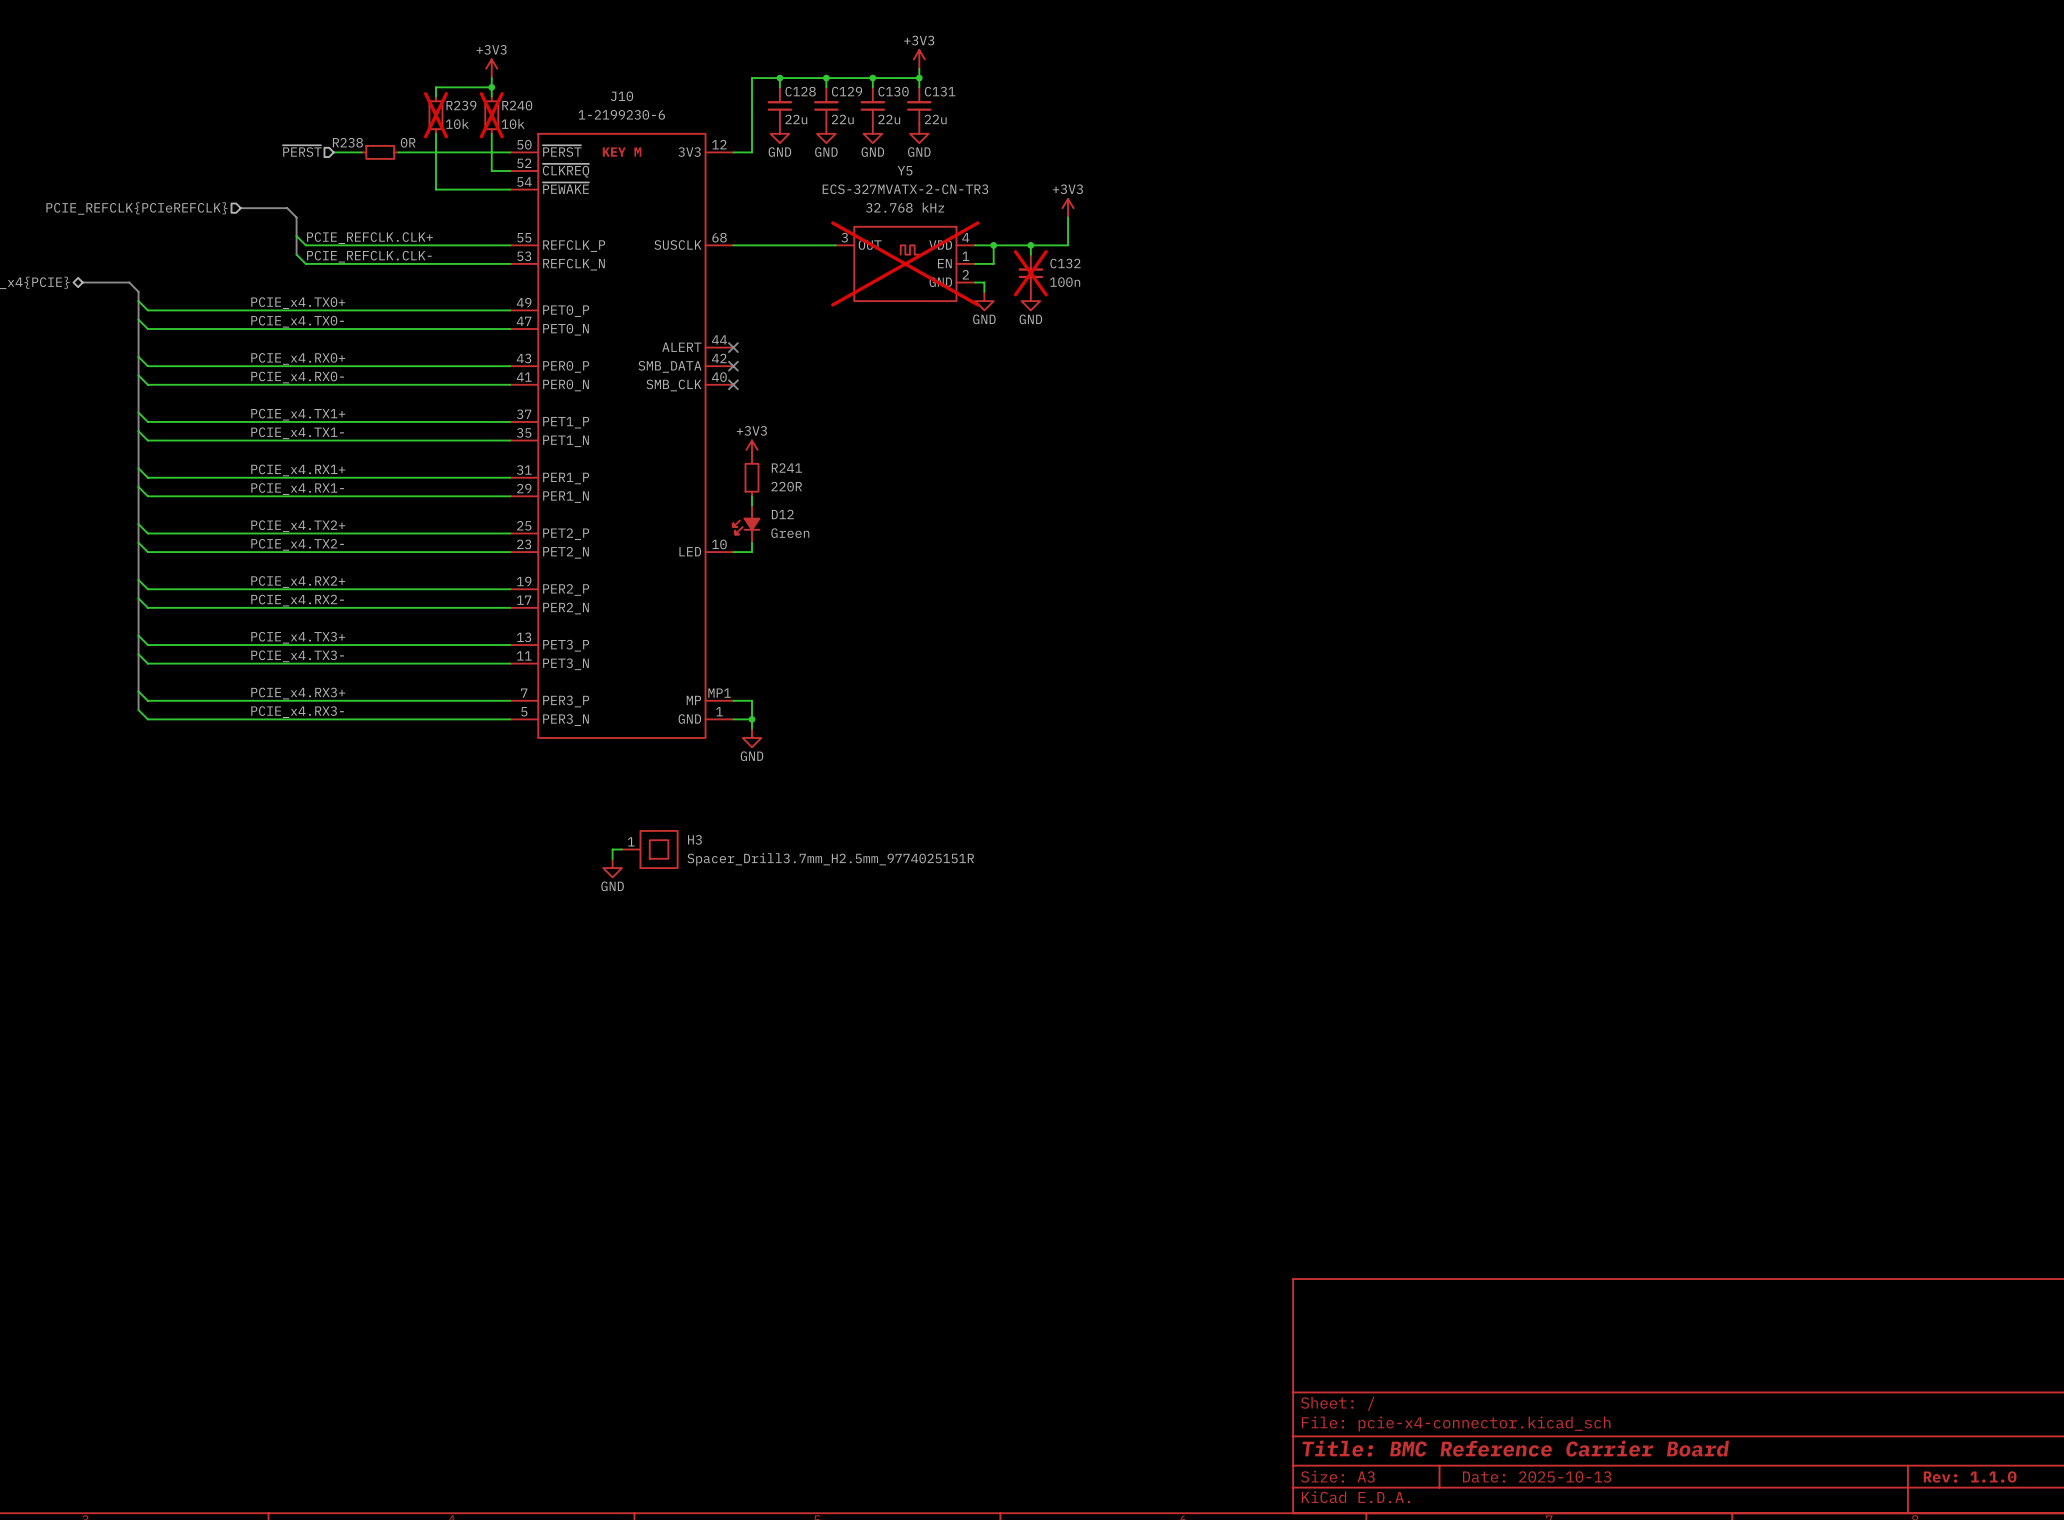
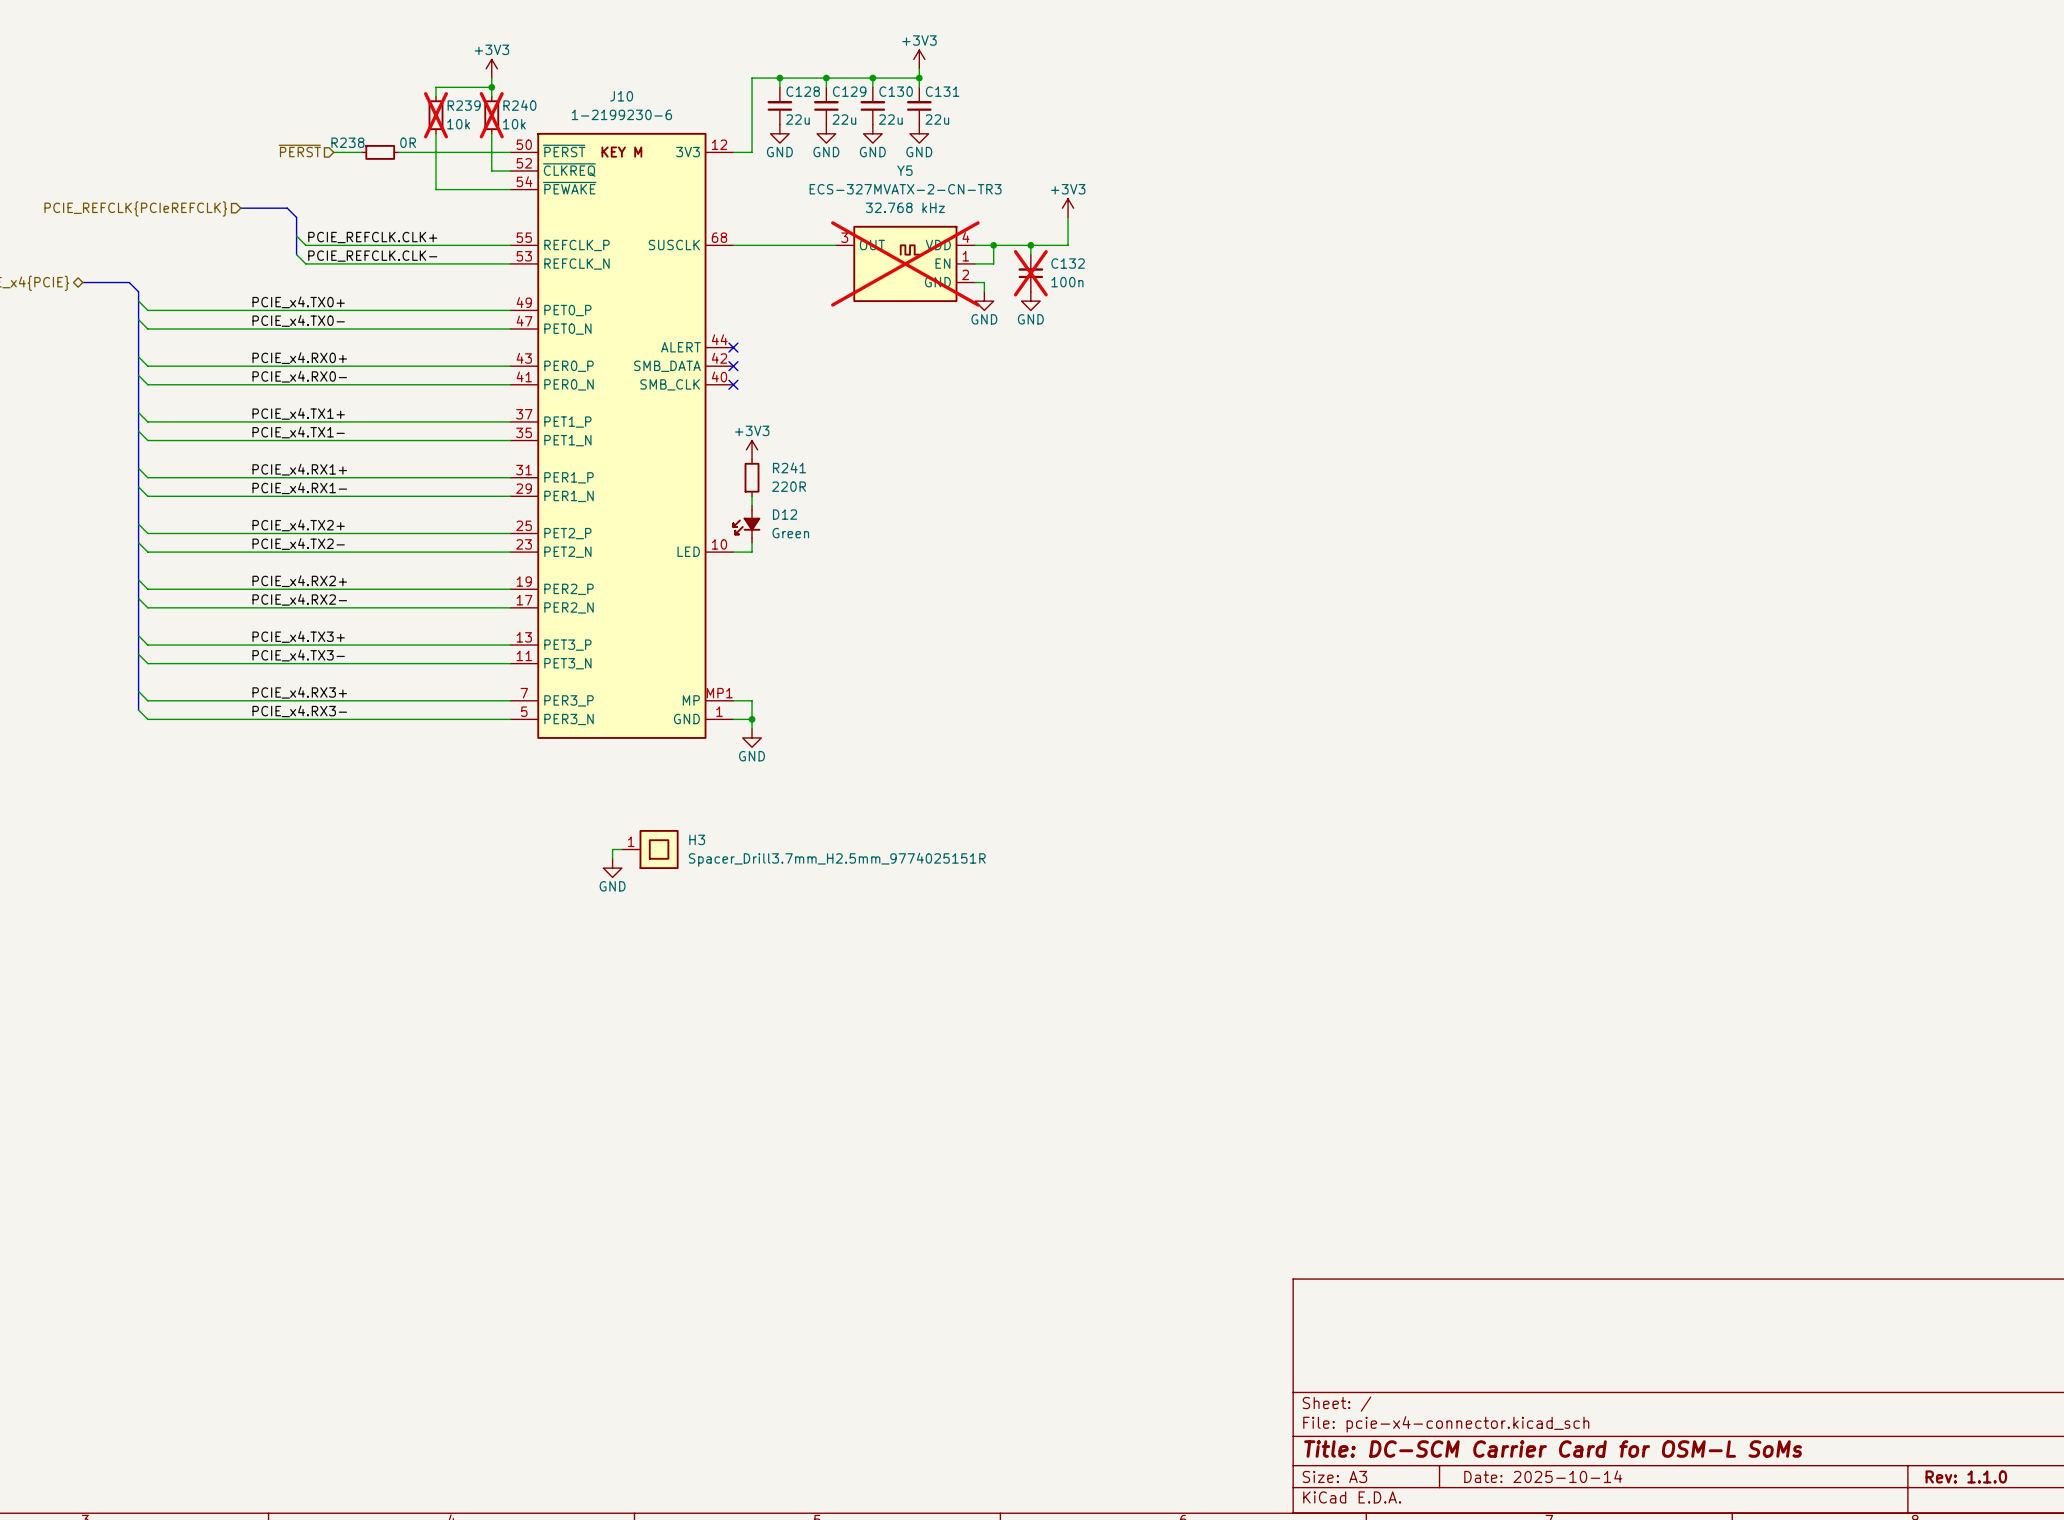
title block: Title: BMC Reference Carrier Board (1515, 1448) -> Title: DC-SCM Carrier Card for OSM-L SoMs (1553, 1449)
title block: Date: 2025-10-13 (1537, 1476) -> Date: 2025-10-14 (1543, 1476)

